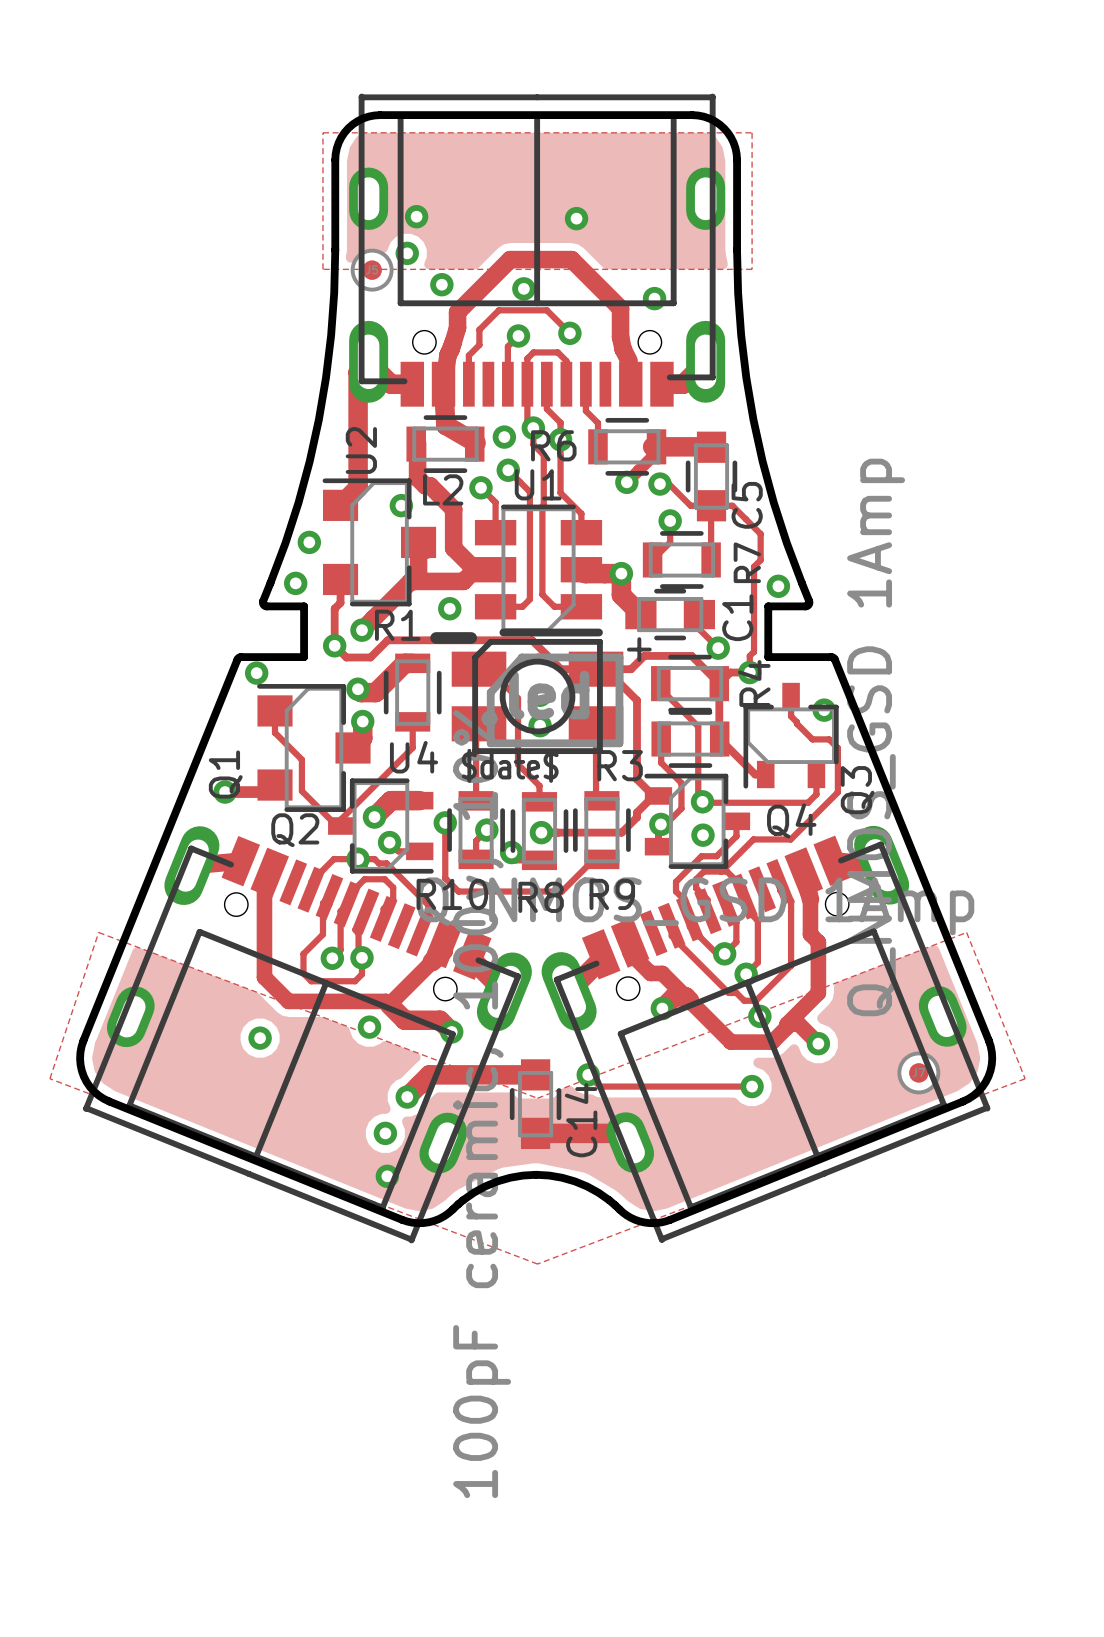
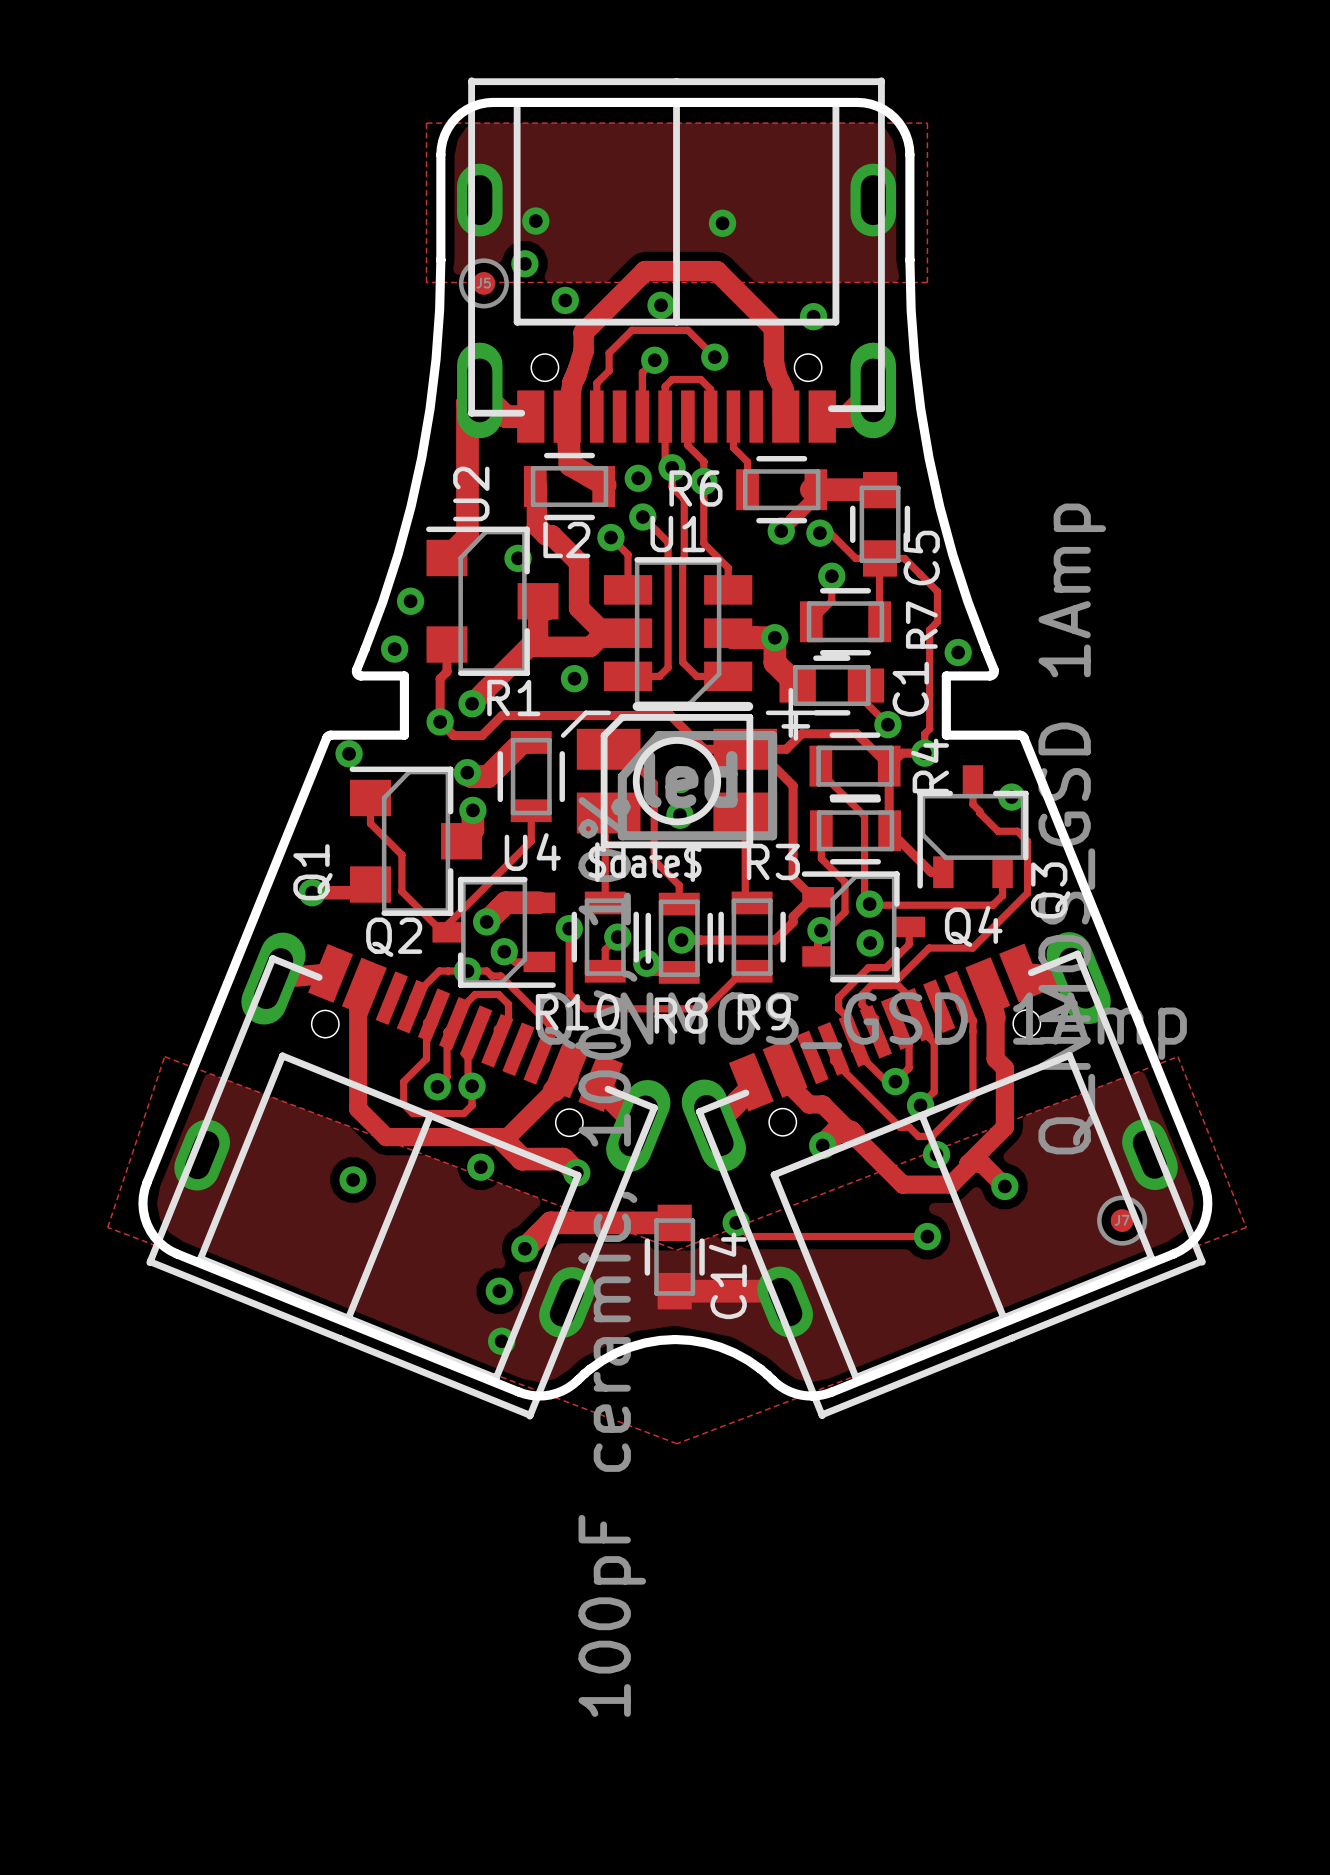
U4 footprint: [430, 632, 624, 755] -> [560, 687, 816, 849]

